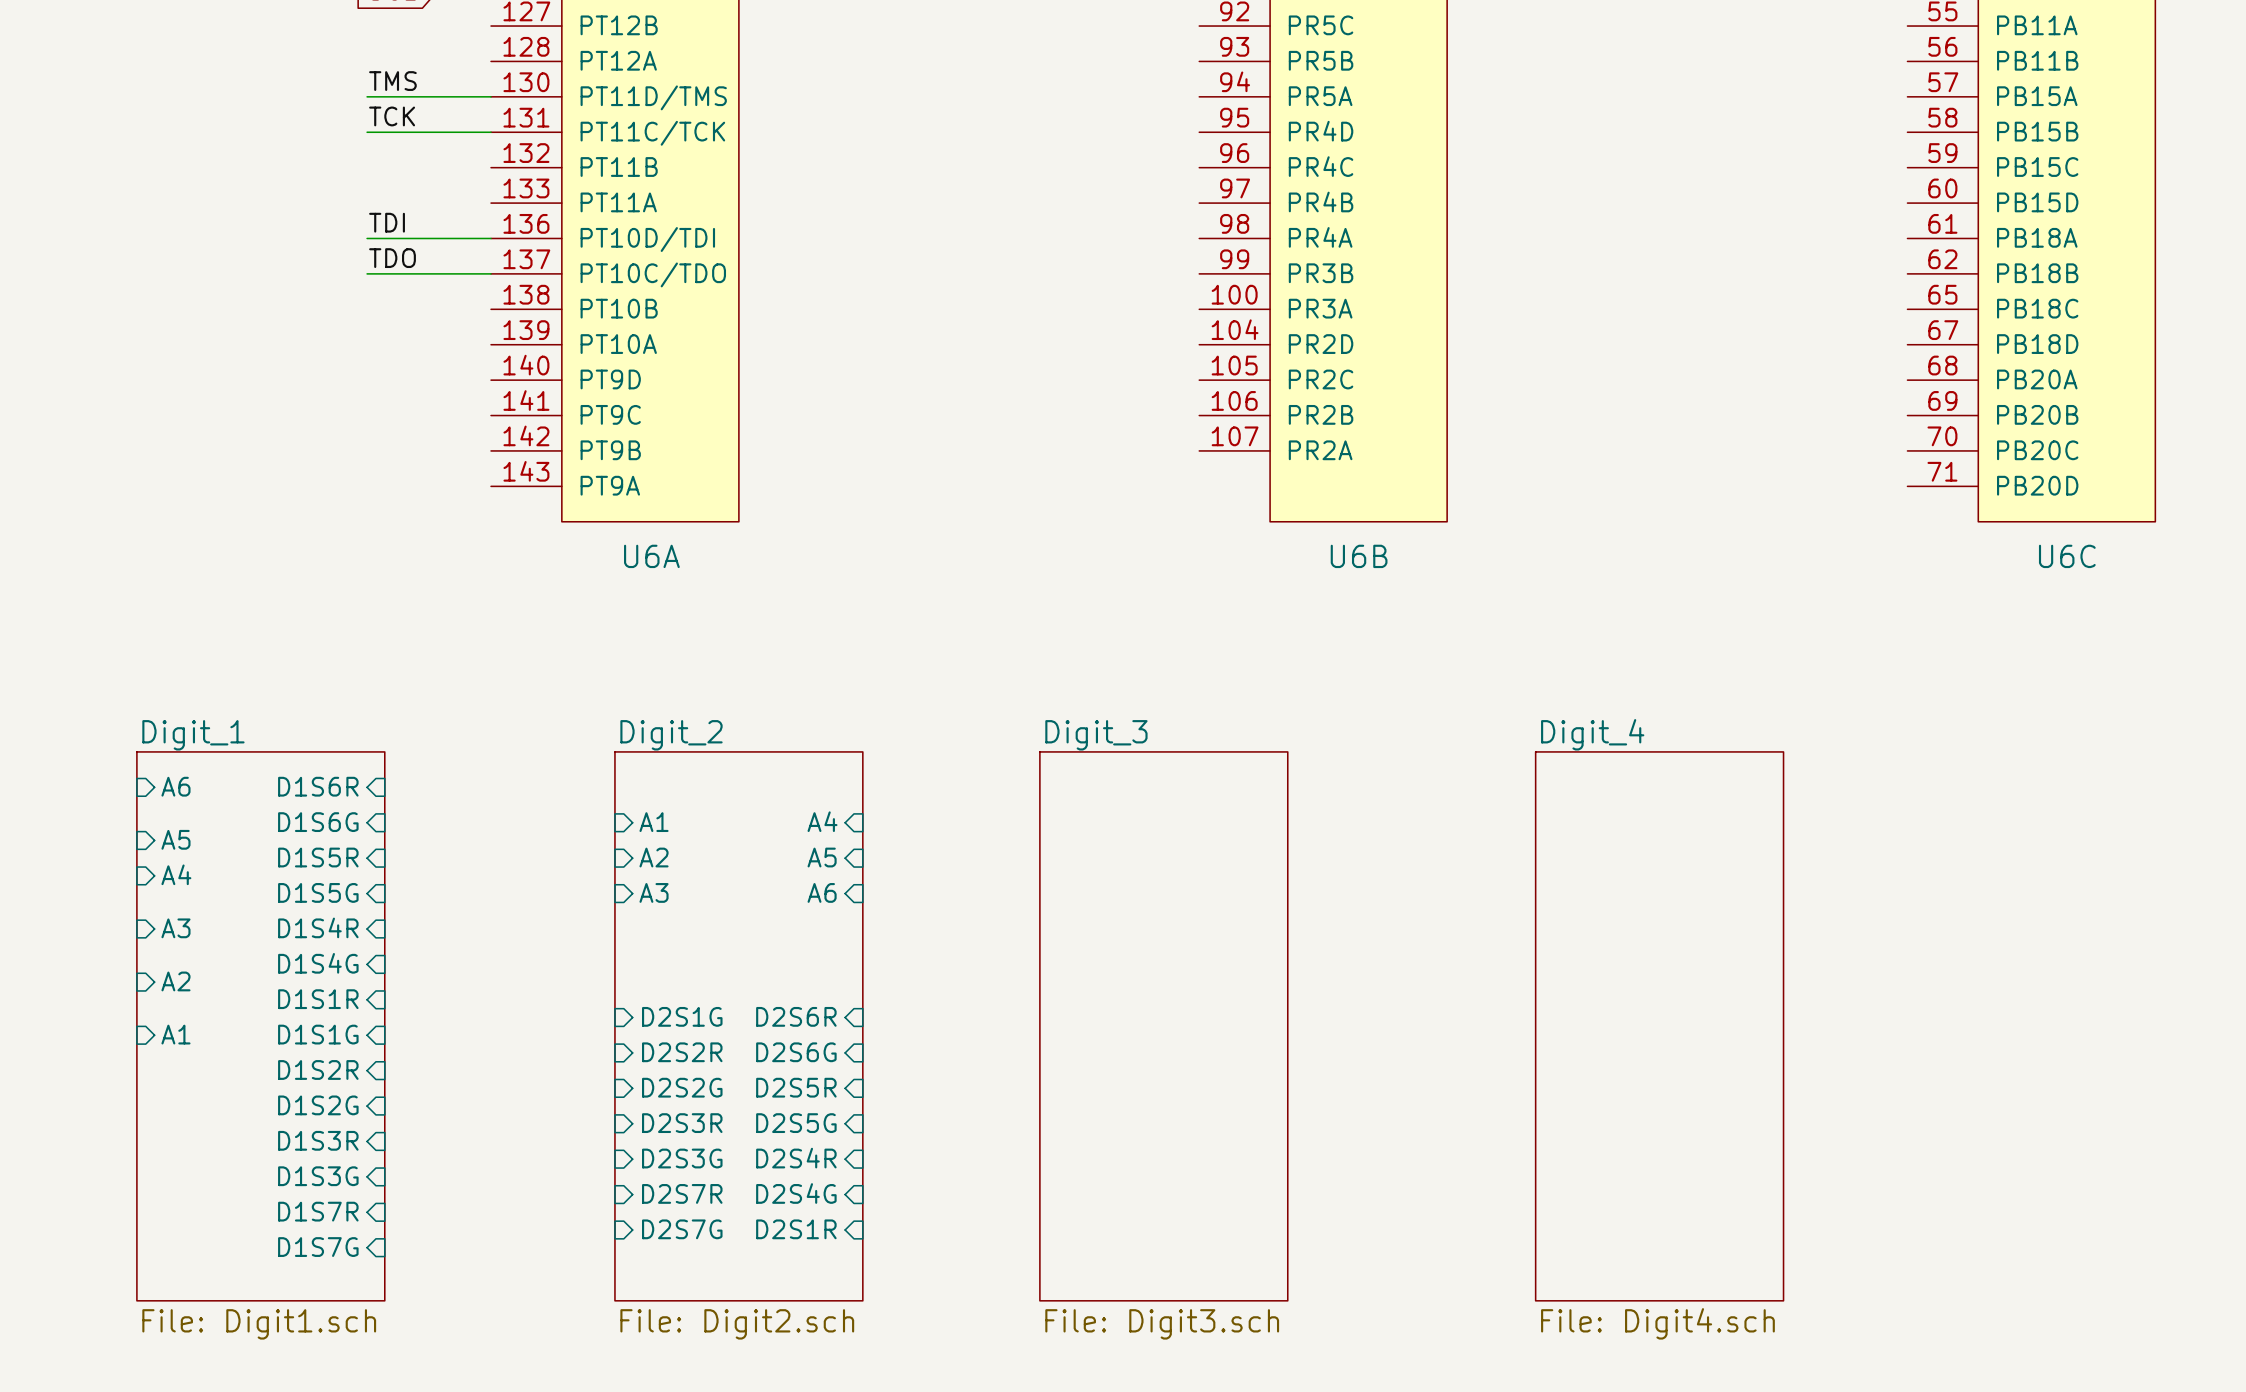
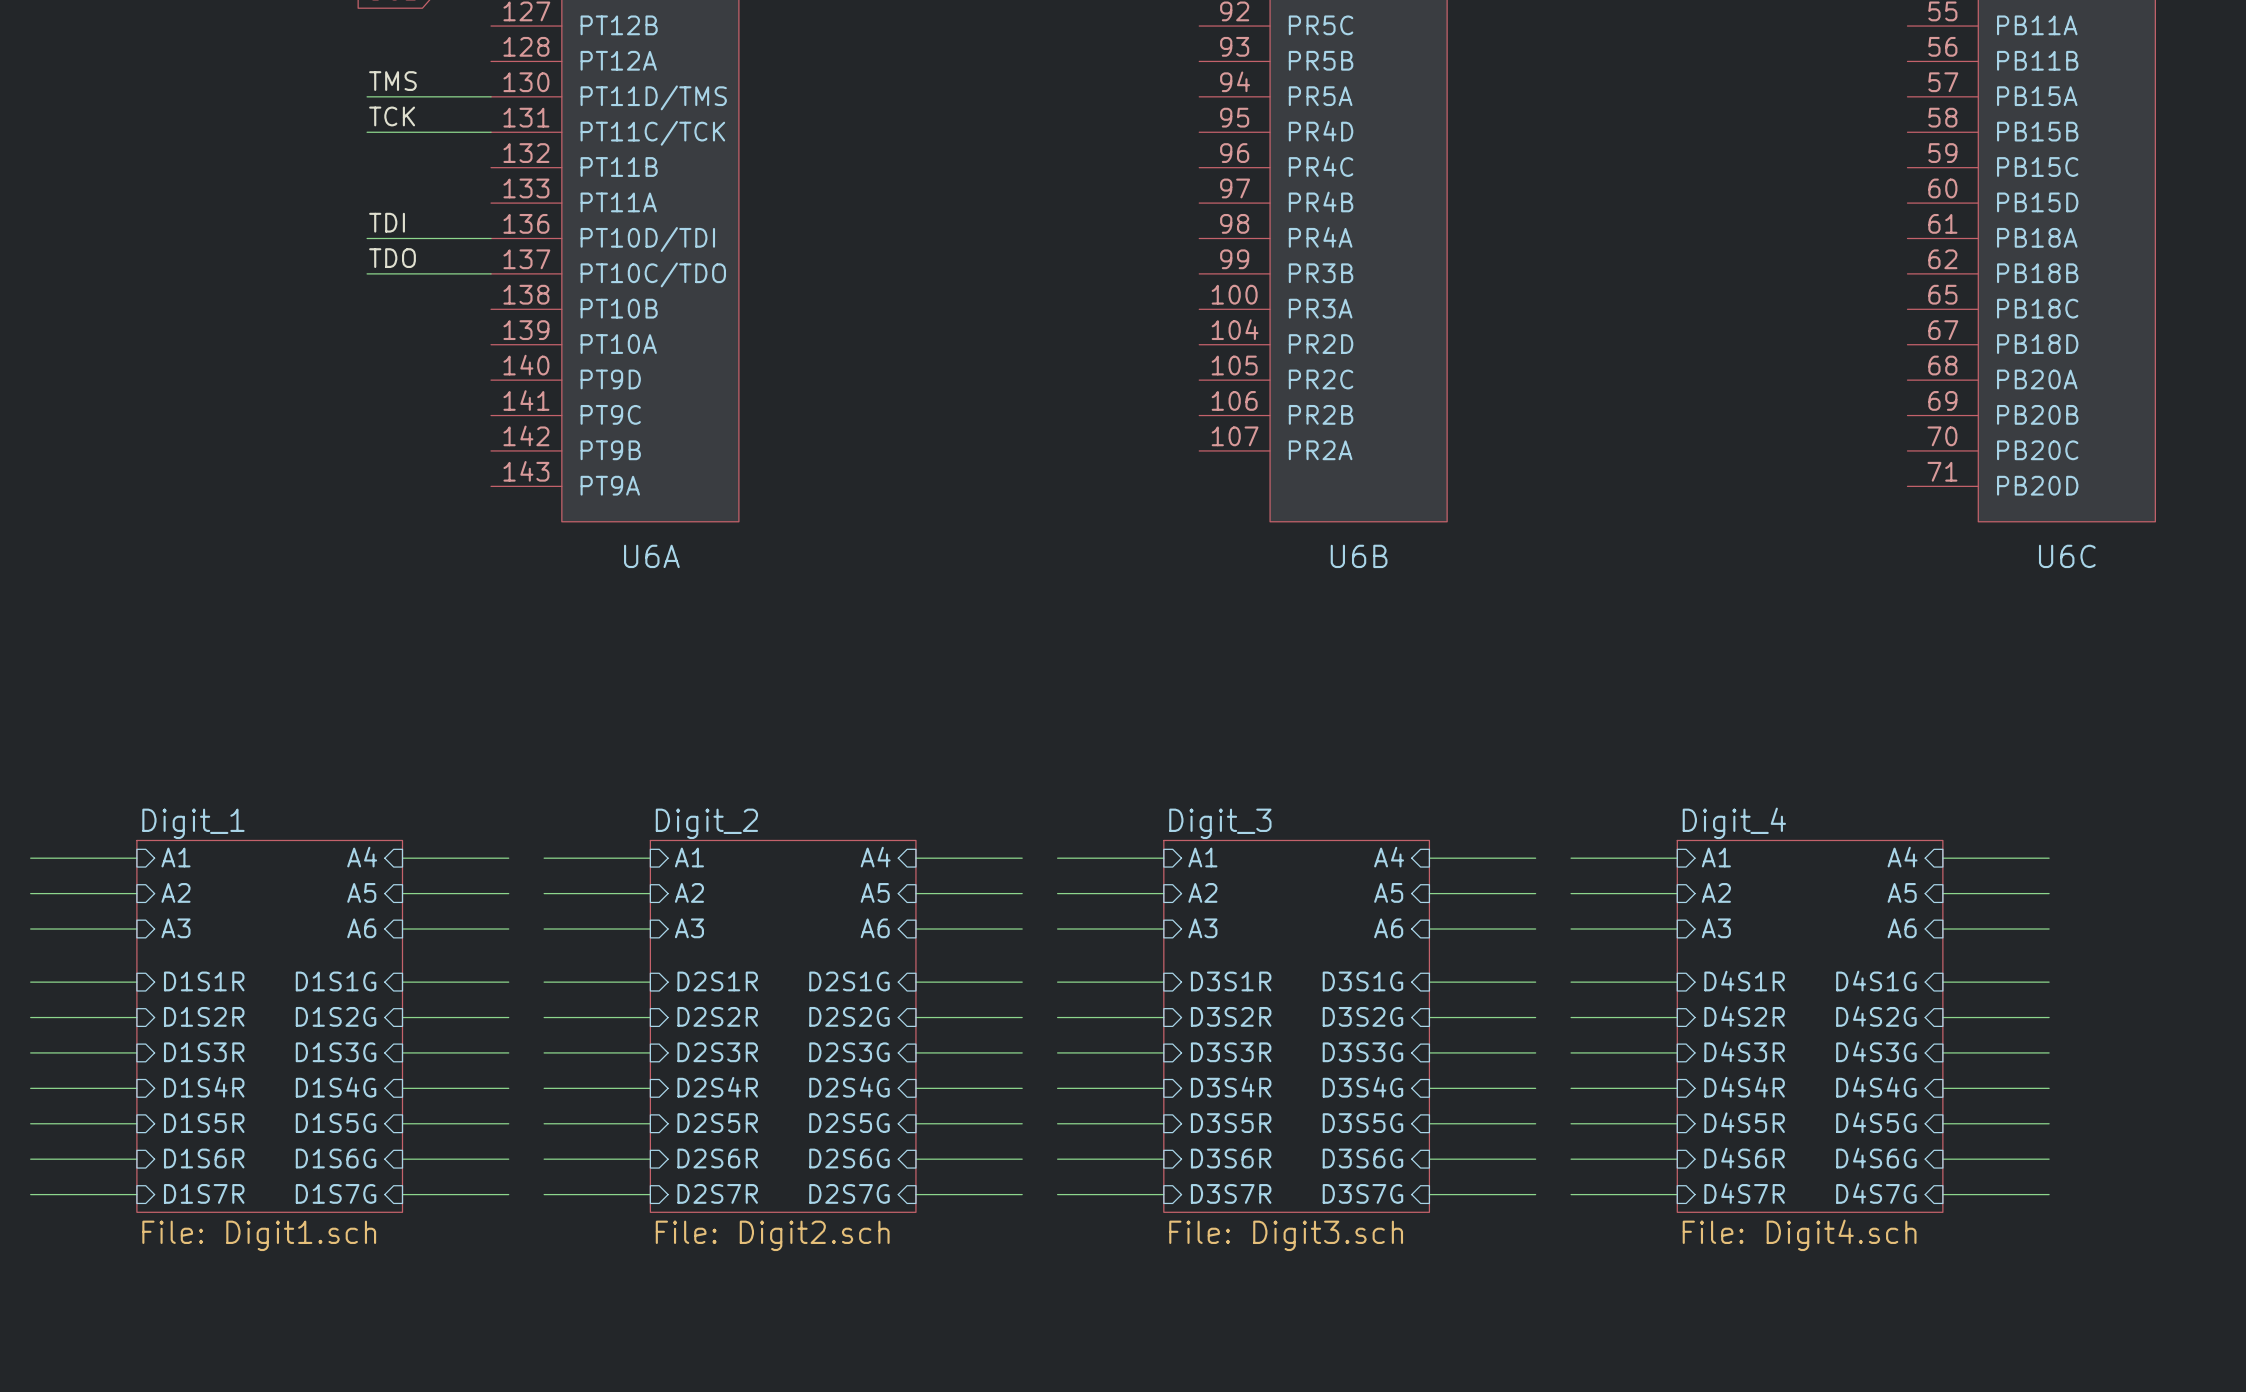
sheet Digit_4 name position: Digit_4 (1592, 734) -> Digit_4 (1734, 823)
sheet Digit_1 name position: Digit_1 (193, 735) -> Digit_1 (193, 823)
sheet Digit_2 name position: Digit_2 (671, 735) -> Digit_2 (706, 823)
sheet Digit_3 name position: Digit_3 (1096, 735) -> Digit_3 (1220, 823)
sheet Digit_1 shape: [136, 751, 385, 1301] -> [136, 840, 403, 1213]
sheet Digit_2 shape: [614, 751, 863, 1301] -> [650, 840, 916, 1213]
sheet Digit_3 shape: [1039, 751, 1288, 1301] -> [1163, 840, 1430, 1213]
sheet Digit_4 shape: [1535, 751, 1784, 1301] -> [1677, 840, 1943, 1213]
sheet pin: A6 (175, 786) -> none
sheet pin: D1S6R (318, 786) -> none
sheet pin position: A4 (822, 821) -> A4 (875, 857)
sheet pin position: D1S6G (318, 822) -> D1S6G (336, 1158)
sheet pin position: A1 (654, 822) -> A1 (689, 857)
sheet pin rotation: 0° (175, 839) -> 180° (361, 892)
sheet pin position: A5 (175, 839) -> A5 (361, 892)
sheet pin rotation: 0° (318, 857) -> 180° (204, 1123)
sheet pin position: D1S5R (318, 857) -> D1S5R (204, 1123)
sheet pin position: A2 (654, 857) -> A2 (689, 892)
sheet pin position: A5 (822, 857) -> A5 (875, 892)
sheet pin: none -> A1 (1202, 857)
sheet pin: none -> A4 (1389, 857)
sheet pin: none -> A1 (1716, 857)
sheet pin: none -> A4 (1902, 857)
wire: none -> (30, 858) (136, 858)
wire: none -> (402, 858) (508, 858)
wire: none -> (544, 858) (650, 858)
wire: none -> (915, 858) (1022, 858)
wire: none -> (1057, 858) (1163, 858)
wire: none -> (1429, 858) (1535, 858)
wire: none -> (1571, 858) (1677, 858)
wire: none -> (1942, 858) (2049, 858)
sheet pin rotation: 0° (176, 874) -> 180° (362, 857)
sheet pin position: A4 (176, 874) -> A4 (362, 857)
sheet pin: none -> A2 (175, 892)
sheet pin position: D1S5G (318, 892) -> D1S5G (336, 1123)
sheet pin position: A3 (654, 892) -> A3 (689, 928)
sheet pin position: A6 (822, 892) -> A6 (875, 928)
sheet pin: none -> A2 (1202, 892)
sheet pin: none -> A5 (1388, 892)
sheet pin: none -> A2 (1716, 892)
sheet pin: none -> A5 (1902, 892)
wire: none -> (30, 893) (136, 893)
wire: none -> (402, 893) (508, 893)
wire: none -> (544, 893) (650, 893)
wire: none -> (915, 893) (1022, 893)
wire: none -> (1057, 893) (1163, 893)
wire: none -> (1429, 893) (1535, 893)
wire: none -> (1571, 893) (1677, 893)
wire: none -> (1942, 893) (2049, 893)
sheet pin rotation: 0° (318, 927) -> 180° (204, 1087)
sheet pin position: D1S4R (318, 927) -> D1S4R (204, 1087)
sheet pin: none -> A6 (361, 928)
sheet pin: none -> A3 (1202, 928)
sheet pin: none -> A6 (1388, 928)
sheet pin: none -> A3 (1716, 928)
sheet pin: none -> A6 (1902, 928)
wire: none -> (30, 929) (136, 929)
wire: none -> (402, 929) (508, 929)
wire: none -> (544, 929) (650, 929)
wire: none -> (915, 929) (1022, 929)
wire: none -> (1057, 929) (1163, 929)
wire: none -> (1429, 929) (1535, 929)
wire: none -> (1571, 929) (1677, 929)
wire: none -> (1942, 929) (2049, 929)
sheet pin position: D1S4G (318, 963) -> D1S4G (336, 1087)
sheet pin: A2 (175, 981) -> D1S1R (204, 981)
sheet pin: none -> D3S1R (1231, 981)
sheet pin: none -> D3S1G (1362, 981)
sheet pin: none -> D4S1R (1744, 981)
sheet pin: none -> D4S1G (1876, 981)
wire: none -> (30, 982) (136, 982)
wire: none -> (402, 982) (508, 982)
wire: none -> (544, 982) (650, 982)
wire: none -> (915, 982) (1022, 982)
wire: none -> (1057, 982) (1163, 982)
wire: none -> (1429, 982) (1535, 982)
wire: none -> (1571, 982) (1677, 982)
wire: none -> (1942, 982) (2049, 982)
sheet pin: D1S1R (318, 999) -> none
sheet pin rotation: 0° (682, 1016) -> 180° (849, 981)
sheet pin position: D2S1G (682, 1016) -> D2S1G (849, 981)
sheet pin rotation: 0° (796, 1016) -> 180° (717, 1158)
sheet pin position: D2S6R (796, 1016) -> D2S6R (717, 1158)
sheet pin: none -> D3S2R (1231, 1016)
sheet pin: none -> D3S2G (1362, 1016)
sheet pin: none -> D4S2R (1744, 1016)
sheet pin: none -> D4S2G (1876, 1016)
wire: none -> (30, 1017) (136, 1017)
wire: none -> (402, 1017) (508, 1017)
wire: none -> (544, 1017) (650, 1017)
wire: none -> (915, 1017) (1022, 1017)
wire: none -> (1057, 1017) (1163, 1017)
wire: none -> (1429, 1017) (1535, 1017)
wire: none -> (1571, 1017) (1677, 1017)
wire: none -> (1942, 1017) (2049, 1017)
sheet pin position: A1 (175, 1034) -> A1 (175, 857)
sheet pin position: D1S1G (318, 1034) -> D1S1G (336, 981)
sheet pin: none -> D4S3R (1744, 1051)
sheet pin: none -> D4S3G (1876, 1051)
wire: none -> (30, 1052) (136, 1052)
wire: none -> (402, 1052) (508, 1052)
wire: none -> (544, 1052) (650, 1052)
sheet pin position: D2S2R (682, 1052) -> D2S2R (717, 1016)
sheet pin position: D2S6G (796, 1052) -> D2S6G (849, 1158)
wire: none -> (915, 1052) (1022, 1052)
wire: none -> (1057, 1052) (1163, 1052)
sheet pin: none -> D3S3R (1231, 1052)
sheet pin: none -> D3S3G (1362, 1052)
wire: none -> (1429, 1052) (1535, 1052)
wire: none -> (1571, 1052) (1677, 1052)
wire: none -> (1942, 1052) (2049, 1052)
sheet pin rotation: 0° (318, 1069) -> 180° (204, 1016)
sheet pin position: D1S2R (318, 1069) -> D1S2R (204, 1016)
sheet pin rotation: 0° (682, 1087) -> 180° (849, 1016)
sheet pin position: D2S2G (682, 1087) -> D2S2G (849, 1016)
sheet pin rotation: 0° (796, 1087) -> 180° (717, 1123)
sheet pin: none -> D3S4R (1231, 1087)
sheet pin: none -> D3S4G (1362, 1087)
sheet pin: none -> D4S4R (1744, 1087)
sheet pin: none -> D4S4G (1876, 1087)
wire: none -> (30, 1088) (136, 1088)
wire: none -> (402, 1088) (508, 1088)
wire: none -> (544, 1088) (650, 1088)
wire: none -> (915, 1088) (1022, 1088)
wire: none -> (1057, 1088) (1163, 1088)
wire: none -> (1429, 1088) (1535, 1088)
wire: none -> (1571, 1088) (1677, 1088)
wire: none -> (1942, 1088) (2049, 1088)
sheet pin position: D1S2G (318, 1105) -> D1S2G (336, 1016)
sheet pin: none -> D4S5R (1744, 1122)
sheet pin: none -> D4S5G (1876, 1122)
wire: none -> (30, 1123) (136, 1123)
wire: none -> (402, 1123) (508, 1123)
wire: none -> (544, 1123) (650, 1123)
sheet pin position: D2S3R (682, 1123) -> D2S3R (717, 1052)
sheet pin position: D2S5G (796, 1123) -> D2S5G (849, 1123)
wire: none -> (915, 1123) (1022, 1123)
wire: none -> (1057, 1123) (1163, 1123)
sheet pin: none -> D3S5R (1231, 1123)
sheet pin: none -> D3S5G (1362, 1123)
wire: none -> (1429, 1123) (1535, 1123)
wire: none -> (1571, 1123) (1677, 1123)
wire: none -> (1942, 1123) (2049, 1123)
sheet pin rotation: 0° (318, 1140) -> 180° (204, 1052)
sheet pin position: D1S3R (318, 1140) -> D1S3R (204, 1052)
sheet pin: none -> D1S6R (204, 1158)
sheet pin rotation: 0° (682, 1158) -> 180° (849, 1052)
sheet pin position: D2S3G (682, 1158) -> D2S3G (849, 1052)
sheet pin rotation: 0° (796, 1158) -> 180° (717, 1087)
sheet pin: none -> D3S6R (1231, 1158)
sheet pin: none -> D3S6G (1362, 1158)
sheet pin: none -> D4S6R (1744, 1158)
sheet pin: none -> D4S6G (1876, 1158)
wire: none -> (30, 1159) (136, 1159)
wire: none -> (402, 1159) (508, 1159)
wire: none -> (544, 1159) (650, 1159)
wire: none -> (915, 1159) (1022, 1159)
wire: none -> (1057, 1159) (1163, 1159)
wire: none -> (1429, 1159) (1535, 1159)
wire: none -> (1571, 1159) (1677, 1159)
wire: none -> (1942, 1159) (2049, 1159)
sheet pin position: D1S3G (318, 1176) -> D1S3G (336, 1052)
sheet pin position: D2S7R (682, 1193) -> D2S7R (717, 1193)
sheet pin position: D2S4G (796, 1193) -> D2S4G (849, 1087)
sheet pin: none -> D3S7R (1231, 1193)
sheet pin: none -> D3S7G (1362, 1193)
sheet pin: none -> D4S7R (1744, 1193)
sheet pin: none -> D4S7G (1876, 1193)
wire: none -> (30, 1194) (136, 1194)
wire: none -> (402, 1194) (508, 1194)
wire: none -> (544, 1194) (650, 1194)
wire: none -> (915, 1194) (1022, 1194)
wire: none -> (1057, 1194) (1163, 1194)
wire: none -> (1429, 1194) (1535, 1194)
wire: none -> (1571, 1194) (1677, 1194)
wire: none -> (1942, 1194) (2049, 1194)
sheet pin rotation: 0° (318, 1211) -> 180° (204, 1193)
sheet pin position: D1S7R (318, 1211) -> D1S7R (204, 1193)
sheet pin rotation: 0° (682, 1229) -> 180° (849, 1193)
sheet pin position: D2S7G (682, 1229) -> D2S7G (849, 1193)
sheet pin rotation: 0° (796, 1229) -> 180° (717, 981)
sheet pin position: D2S1R (796, 1229) -> D2S1R (717, 981)
sheet pin position: D1S7G (318, 1247) -> D1S7G (336, 1193)
sheet Digit_4 value position: File: Digit4.sch (1657, 1323) -> File: Digit4.sch (1799, 1235)
sheet Digit_1 value position: File: Digit1.sch (259, 1324) -> File: Digit1.sch (259, 1235)
sheet Digit_2 value position: File: Digit2.sch (737, 1324) -> File: Digit2.sch (772, 1235)
sheet Digit_3 value position: File: Digit3.sch (1162, 1324) -> File: Digit3.sch (1286, 1235)

